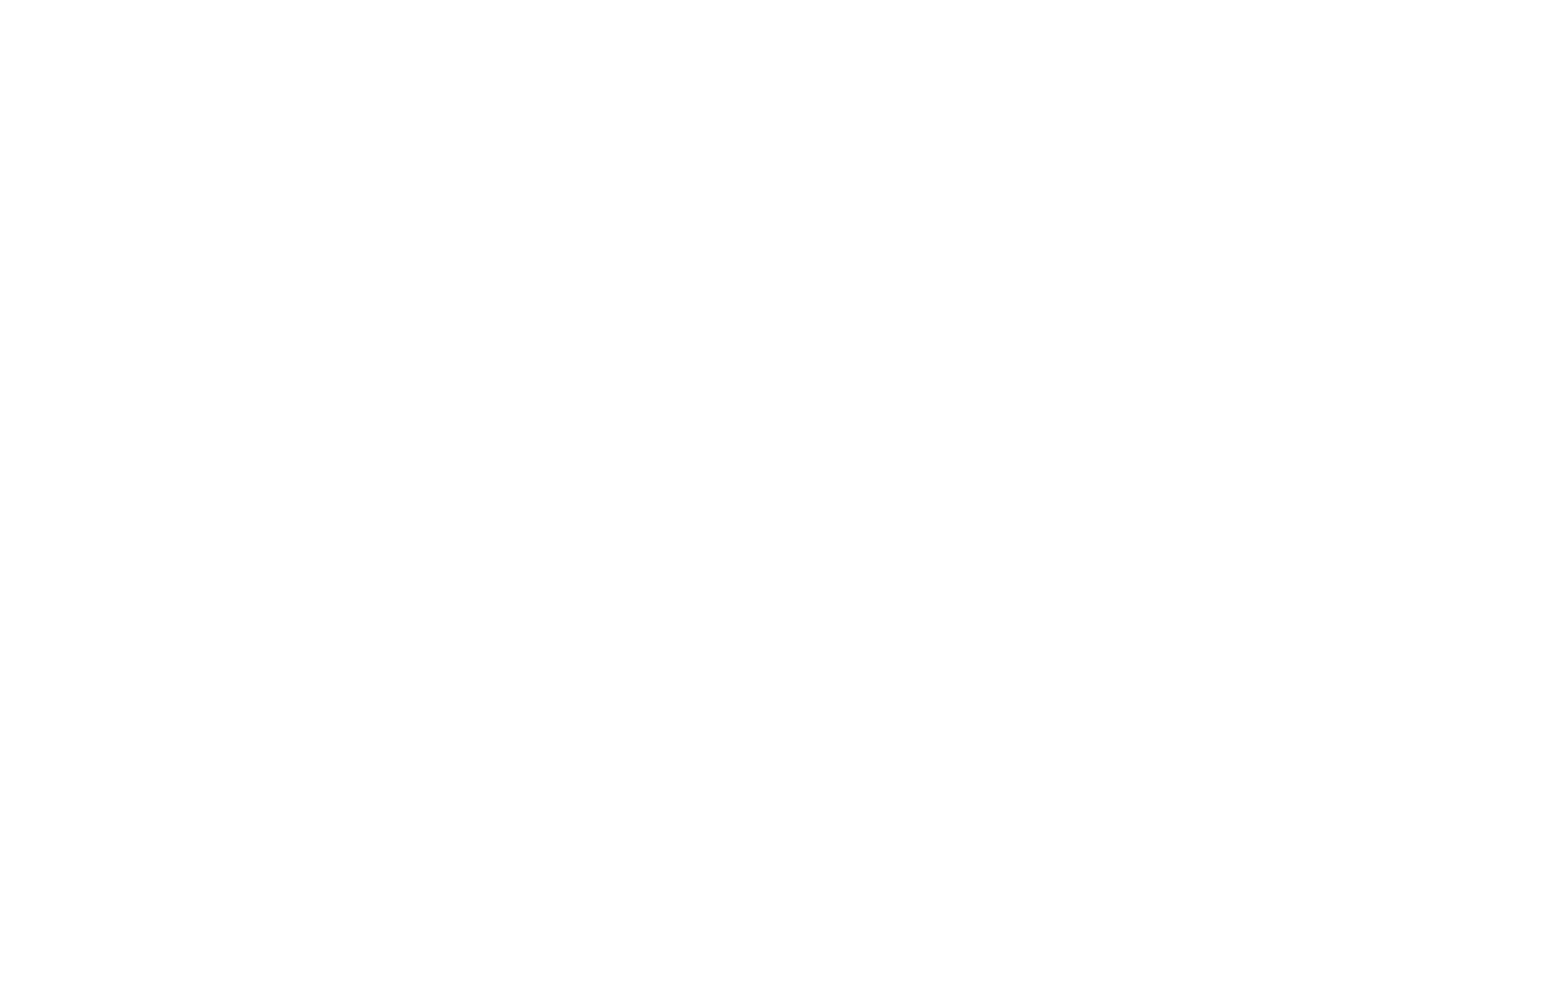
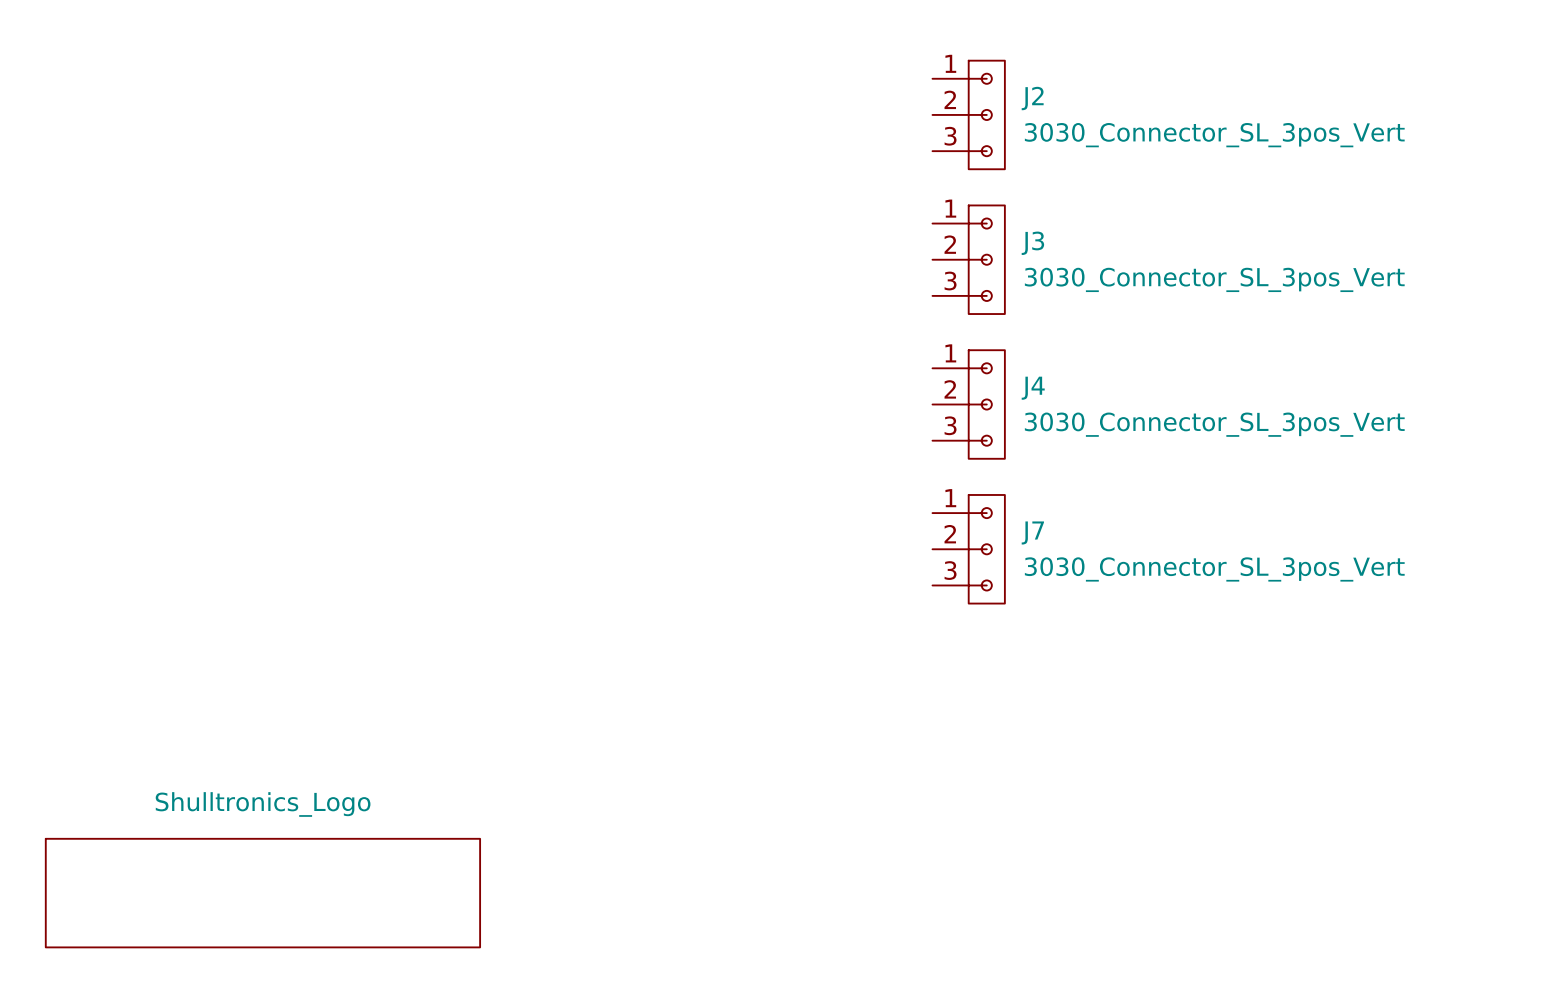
J2: none -> 3030_Connector_SL_3pos_Vert (968, 114)
J3: none -> 3030_Connector_SL_3pos_Vert (968, 259)
J4: none -> 3030_Connector_SL_3pos_Vert (968, 404)
J7: none -> 3030_Connector_SL_3pos_Vert (968, 549)
part: none -> Shulltronics_Logo (262, 893)

